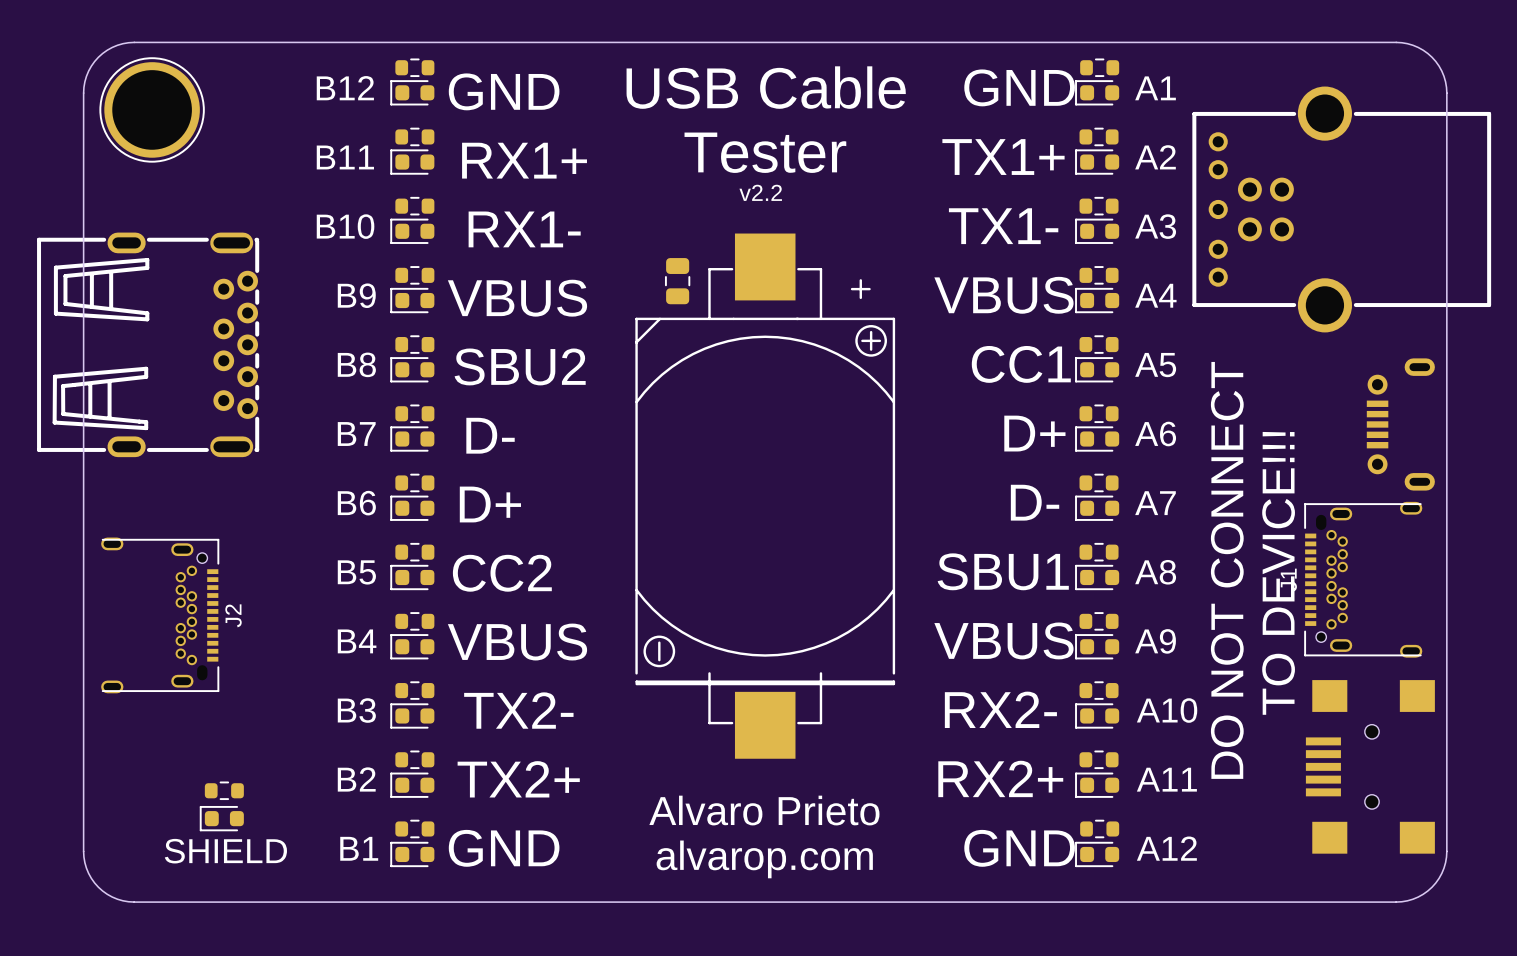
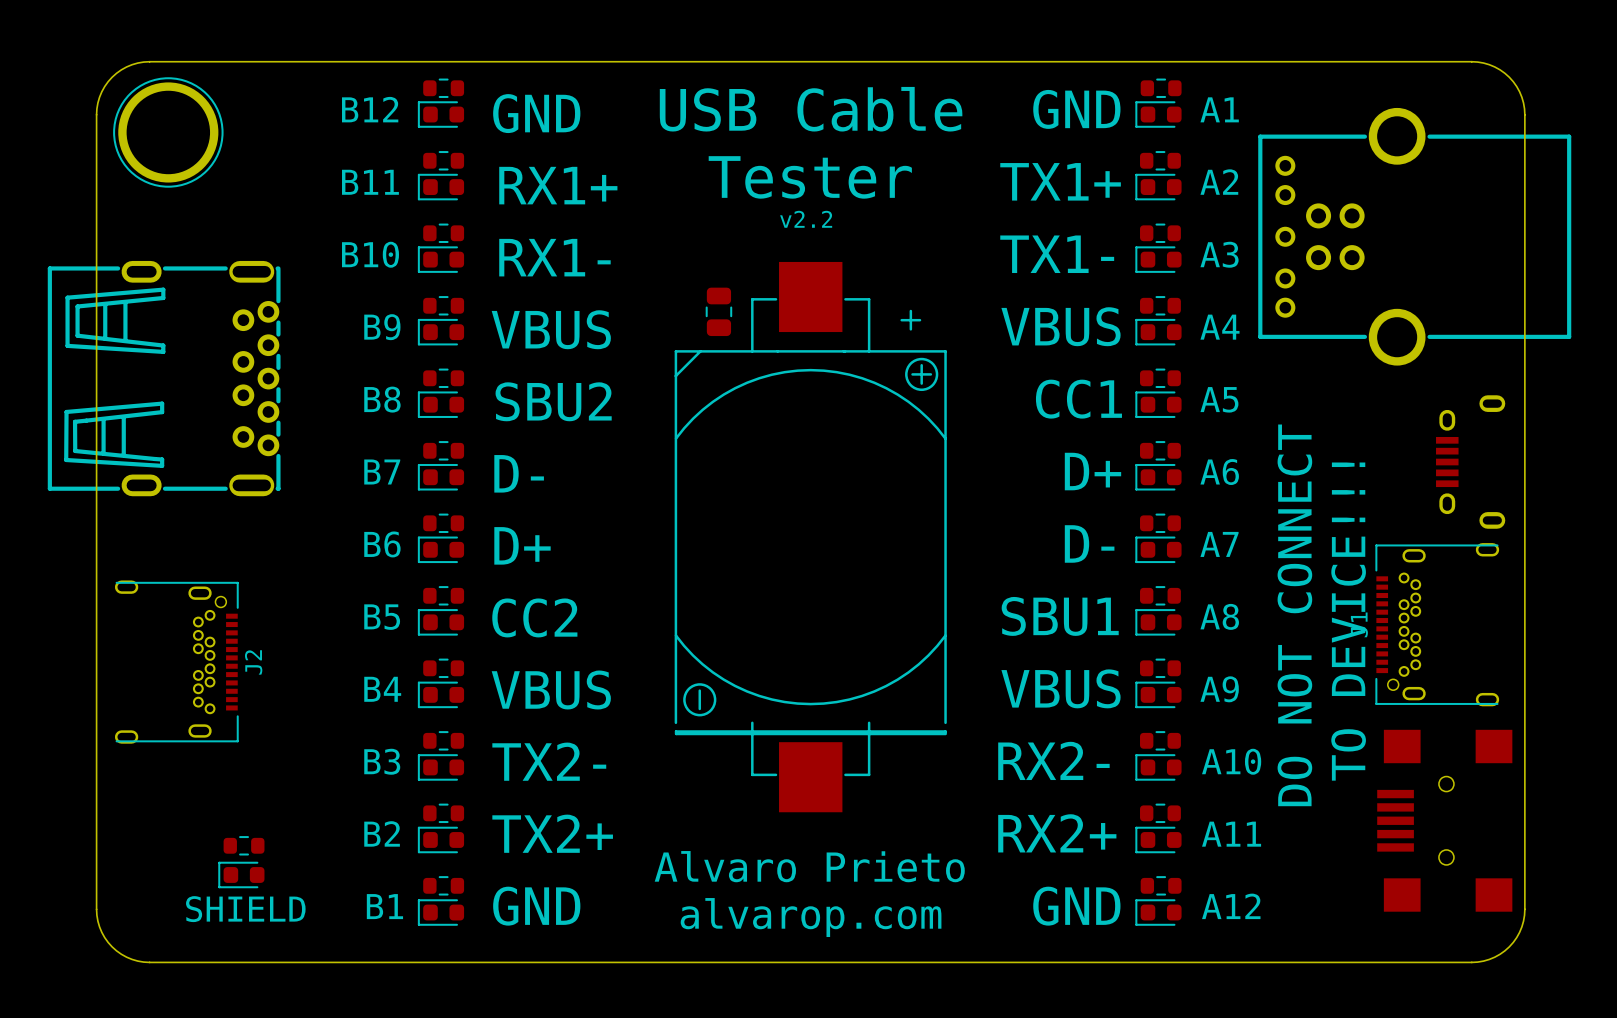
part footprint: [1366, 358, 1435, 491] -> [1436, 395, 1506, 529]

